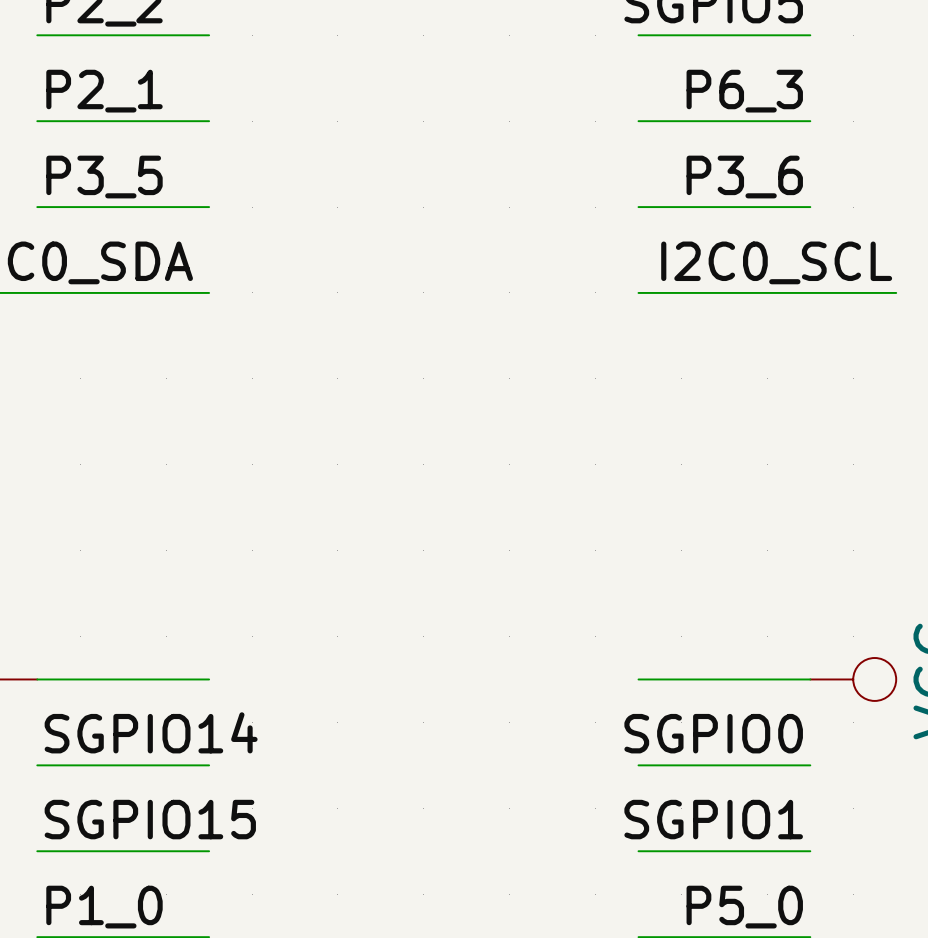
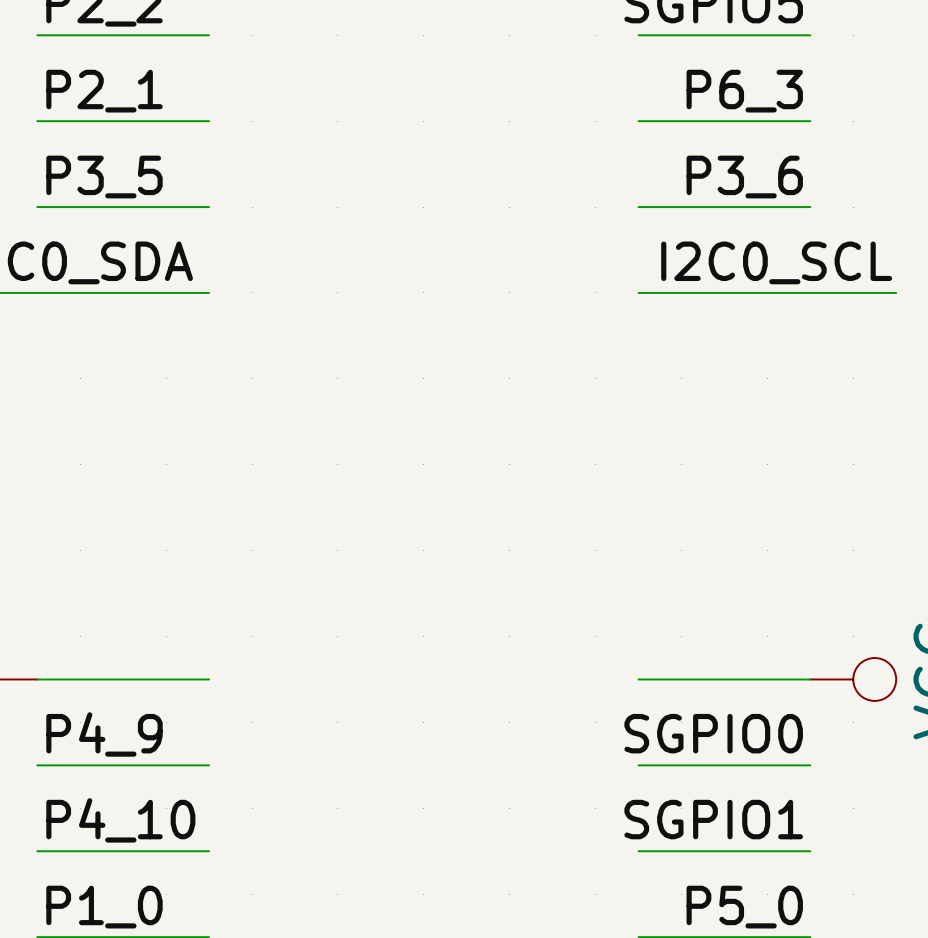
label: SGPIO14 (151, 732) -> P4_9 (104, 734)
label: SGPIO15 (150, 819) -> P4_10 (120, 820)

